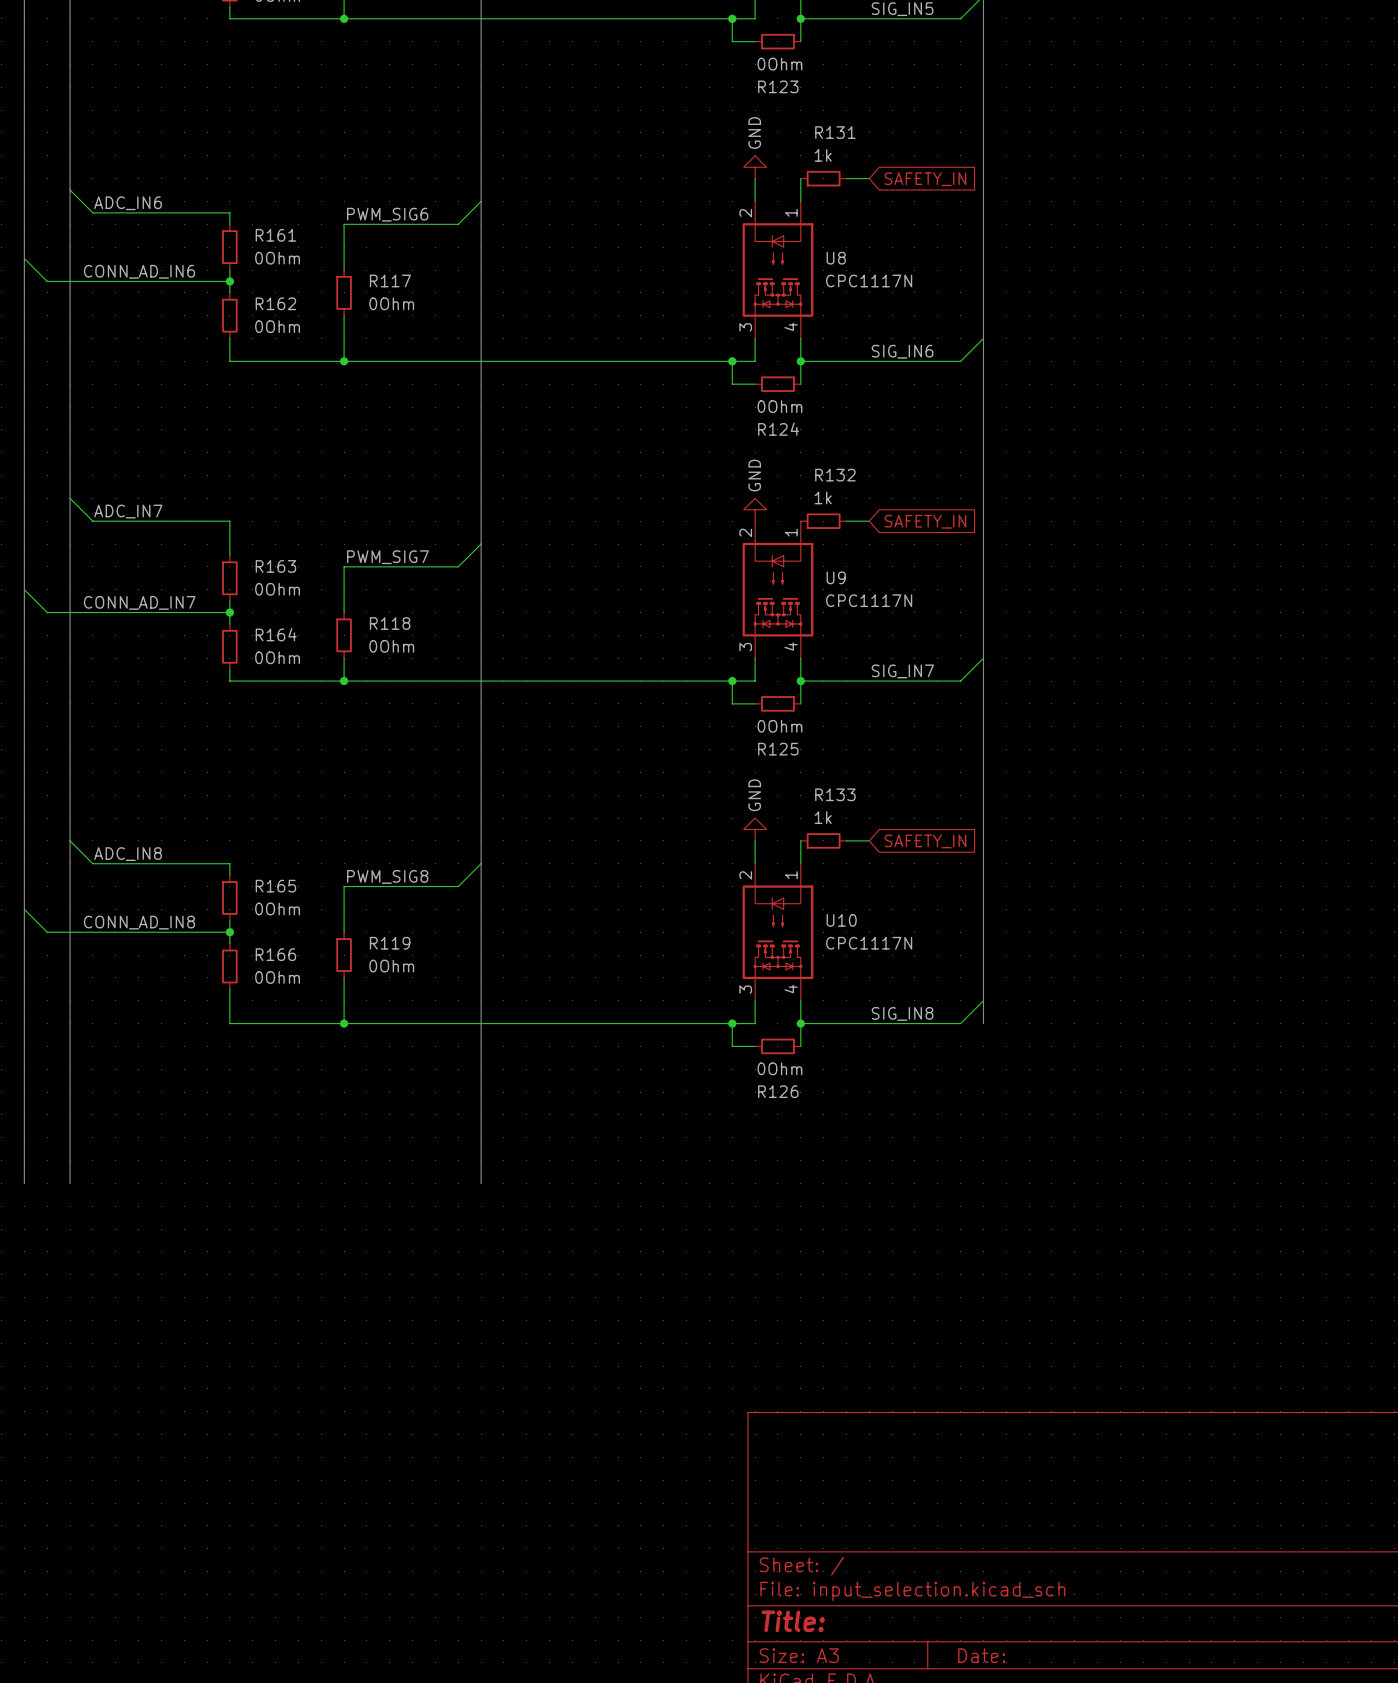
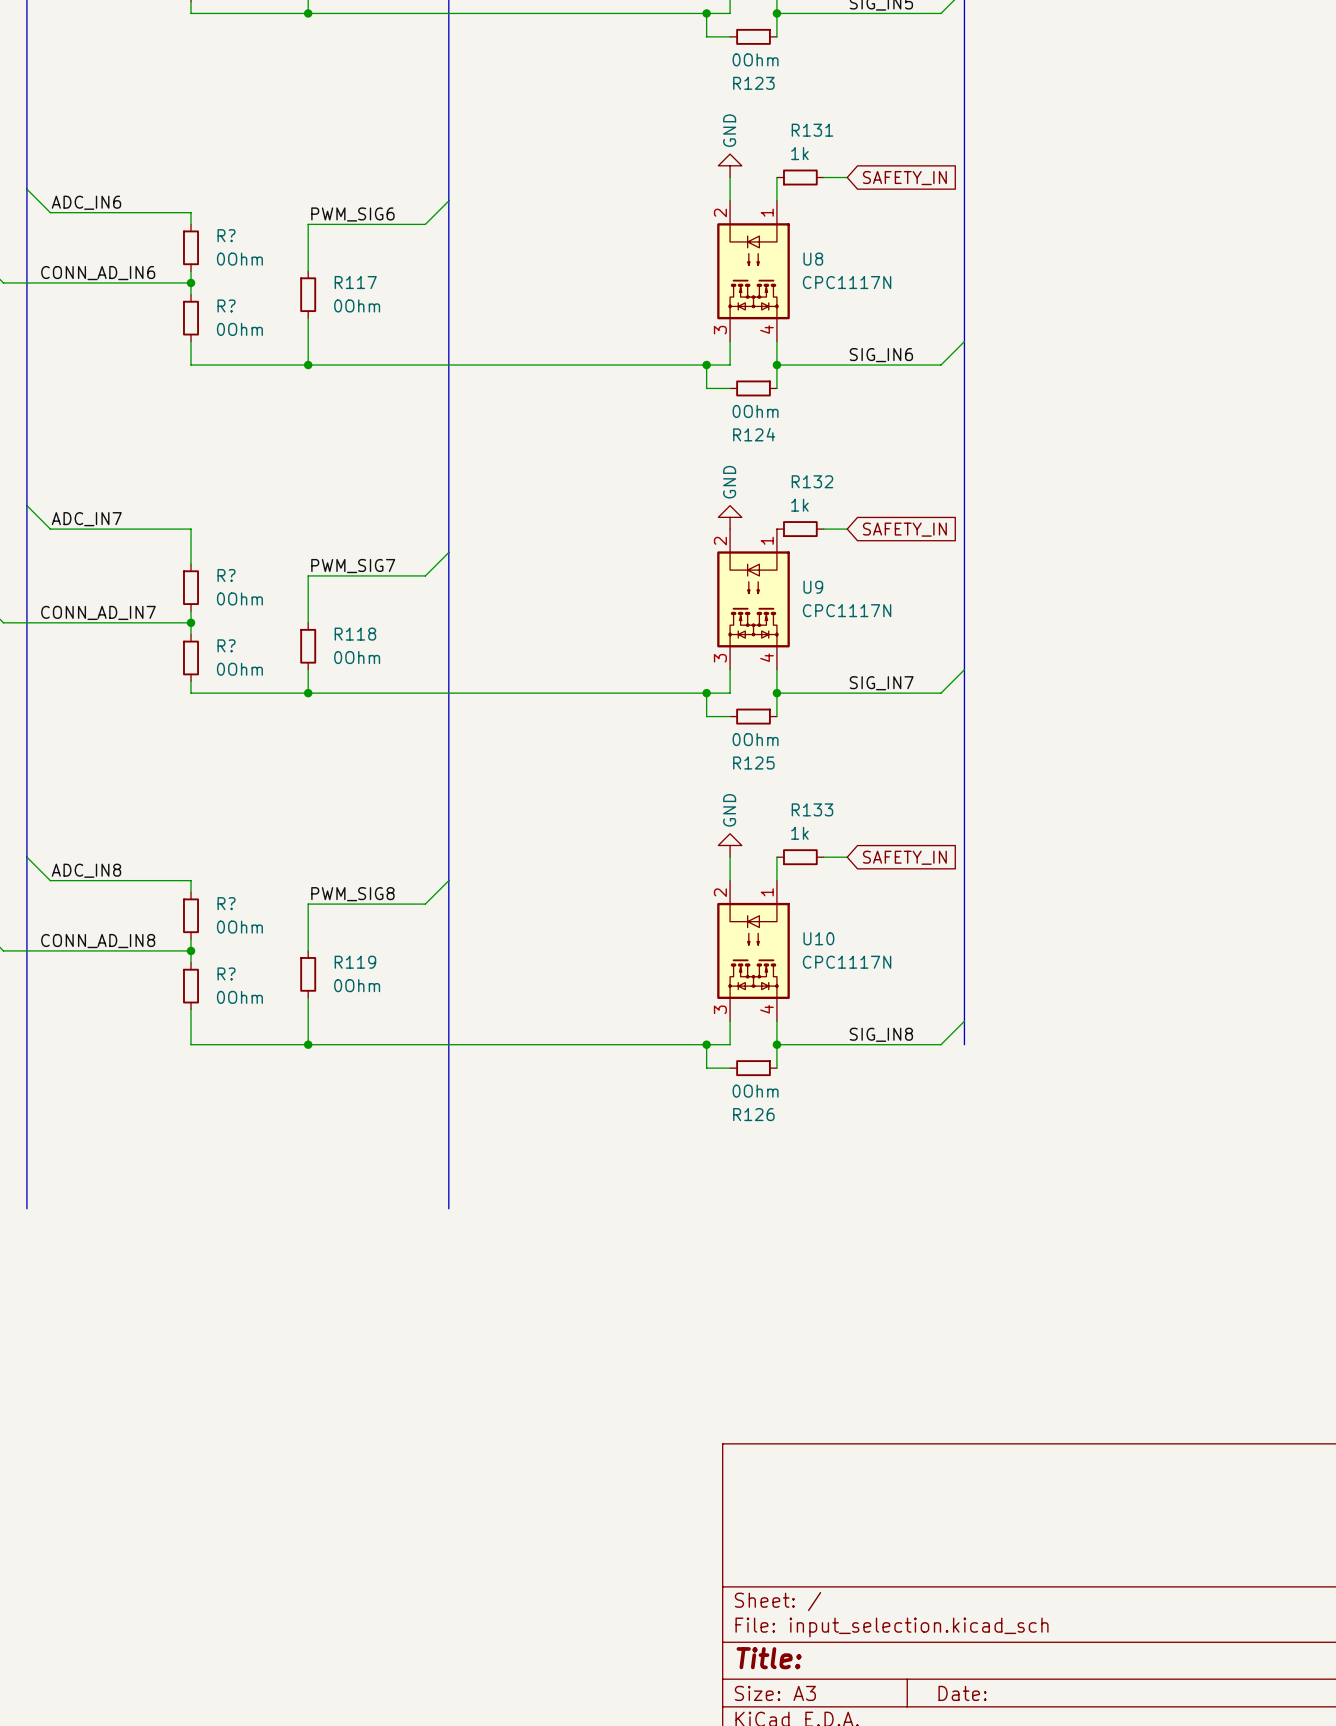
R161 name: R161 (275, 235) -> R? (226, 235)
R162 name: R162 (275, 303) -> R? (226, 305)
R163 name: R163 (275, 566) -> R? (226, 575)
R164 name: R164 (276, 634) -> R? (226, 645)
R165 name: R165 (275, 886) -> R? (226, 903)
R166 name: R166 (275, 954) -> R? (226, 973)

